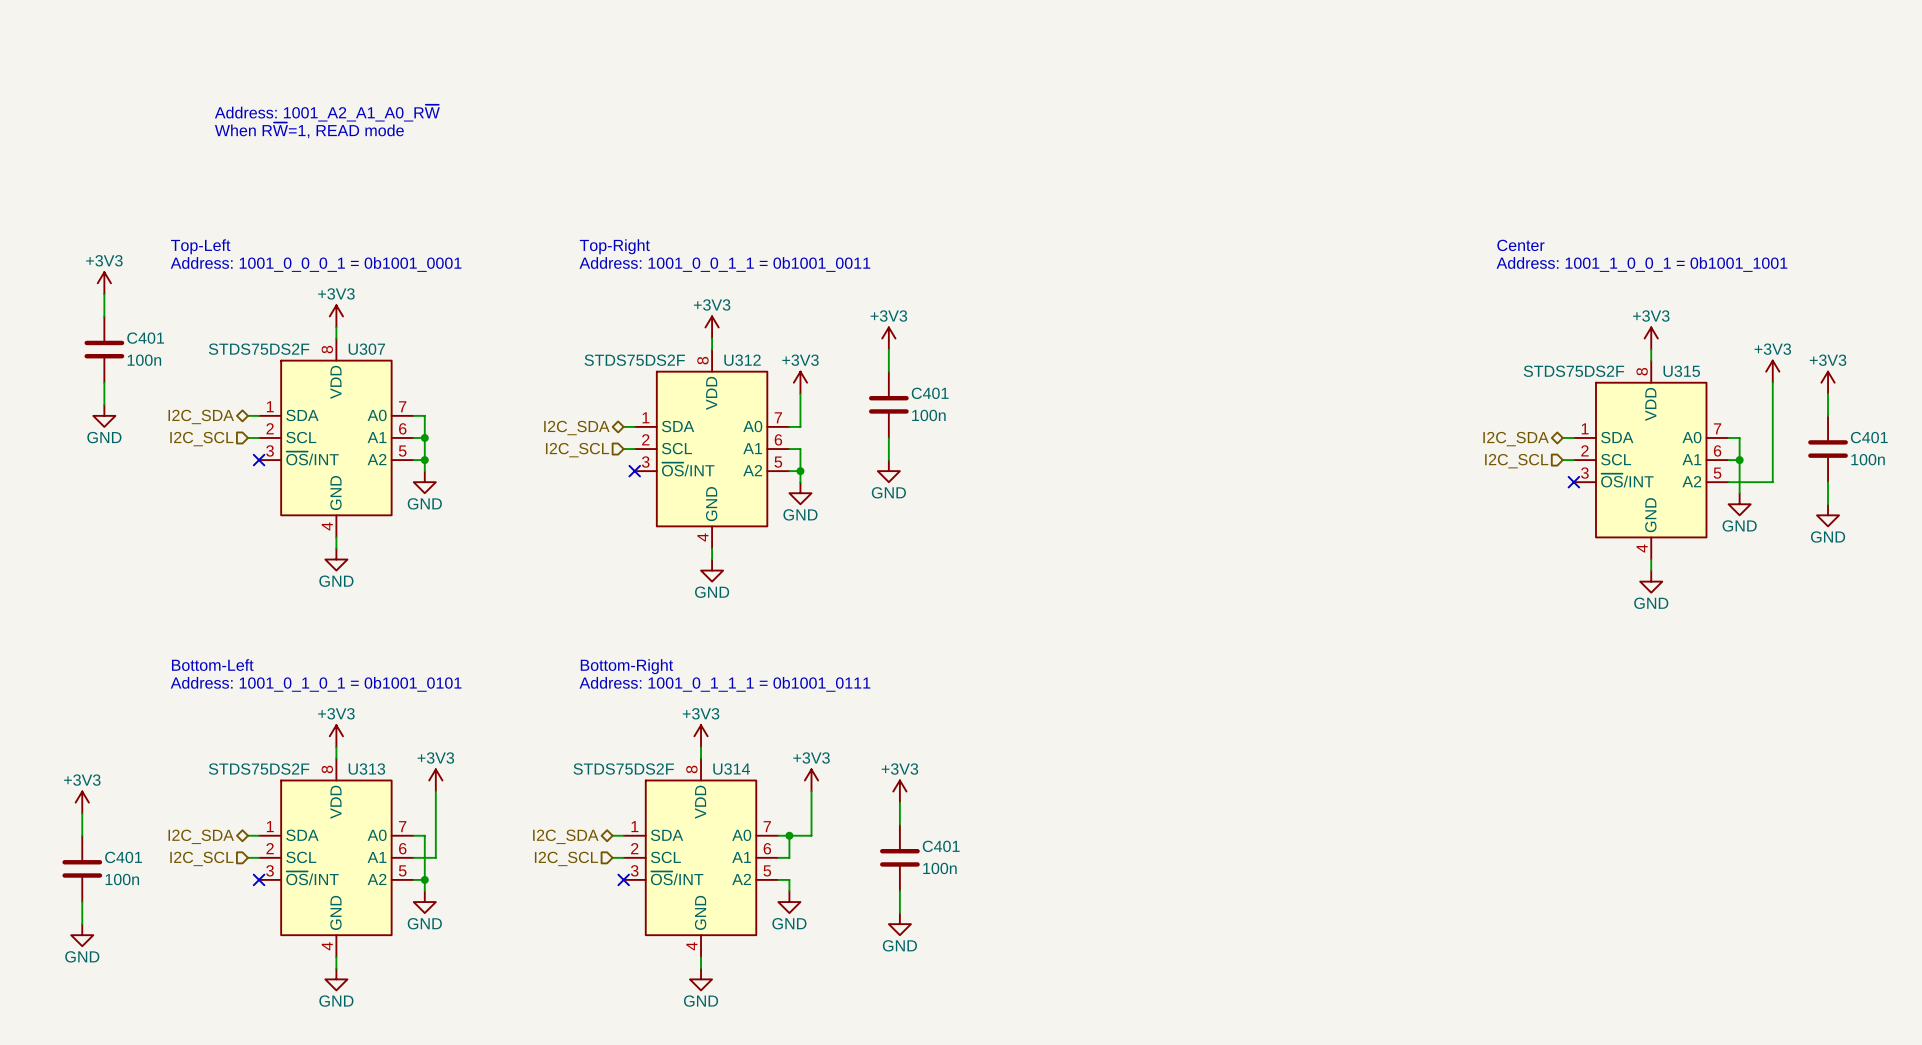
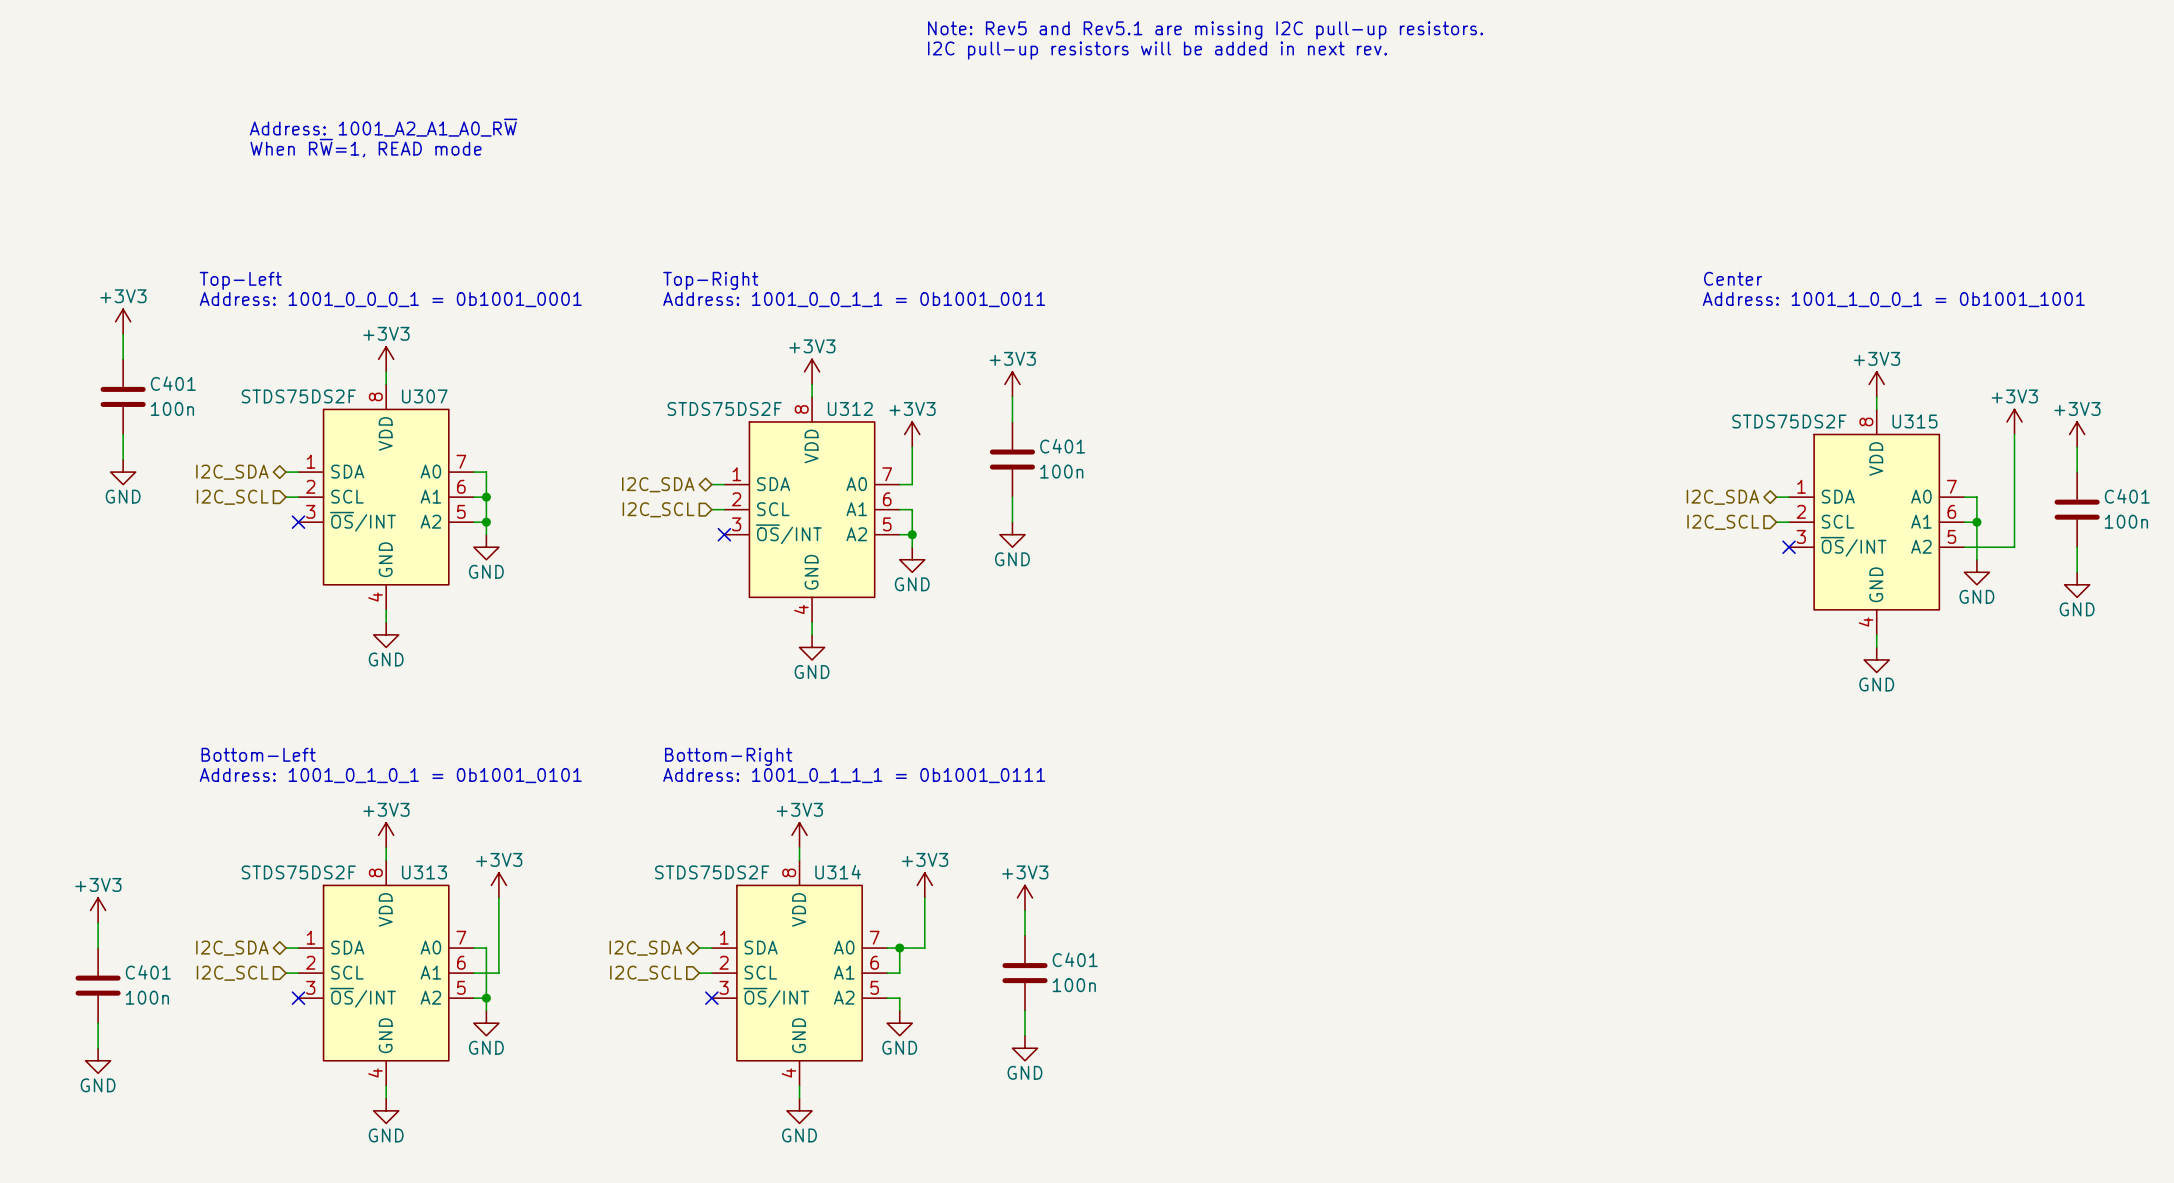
text: none -> Note: Rev5 and Rev5.1 are missing I2C pull-up resistors. (1205, 30)
text: none -> I2C pull-up resistors will be added in next rev. (1157, 50)

